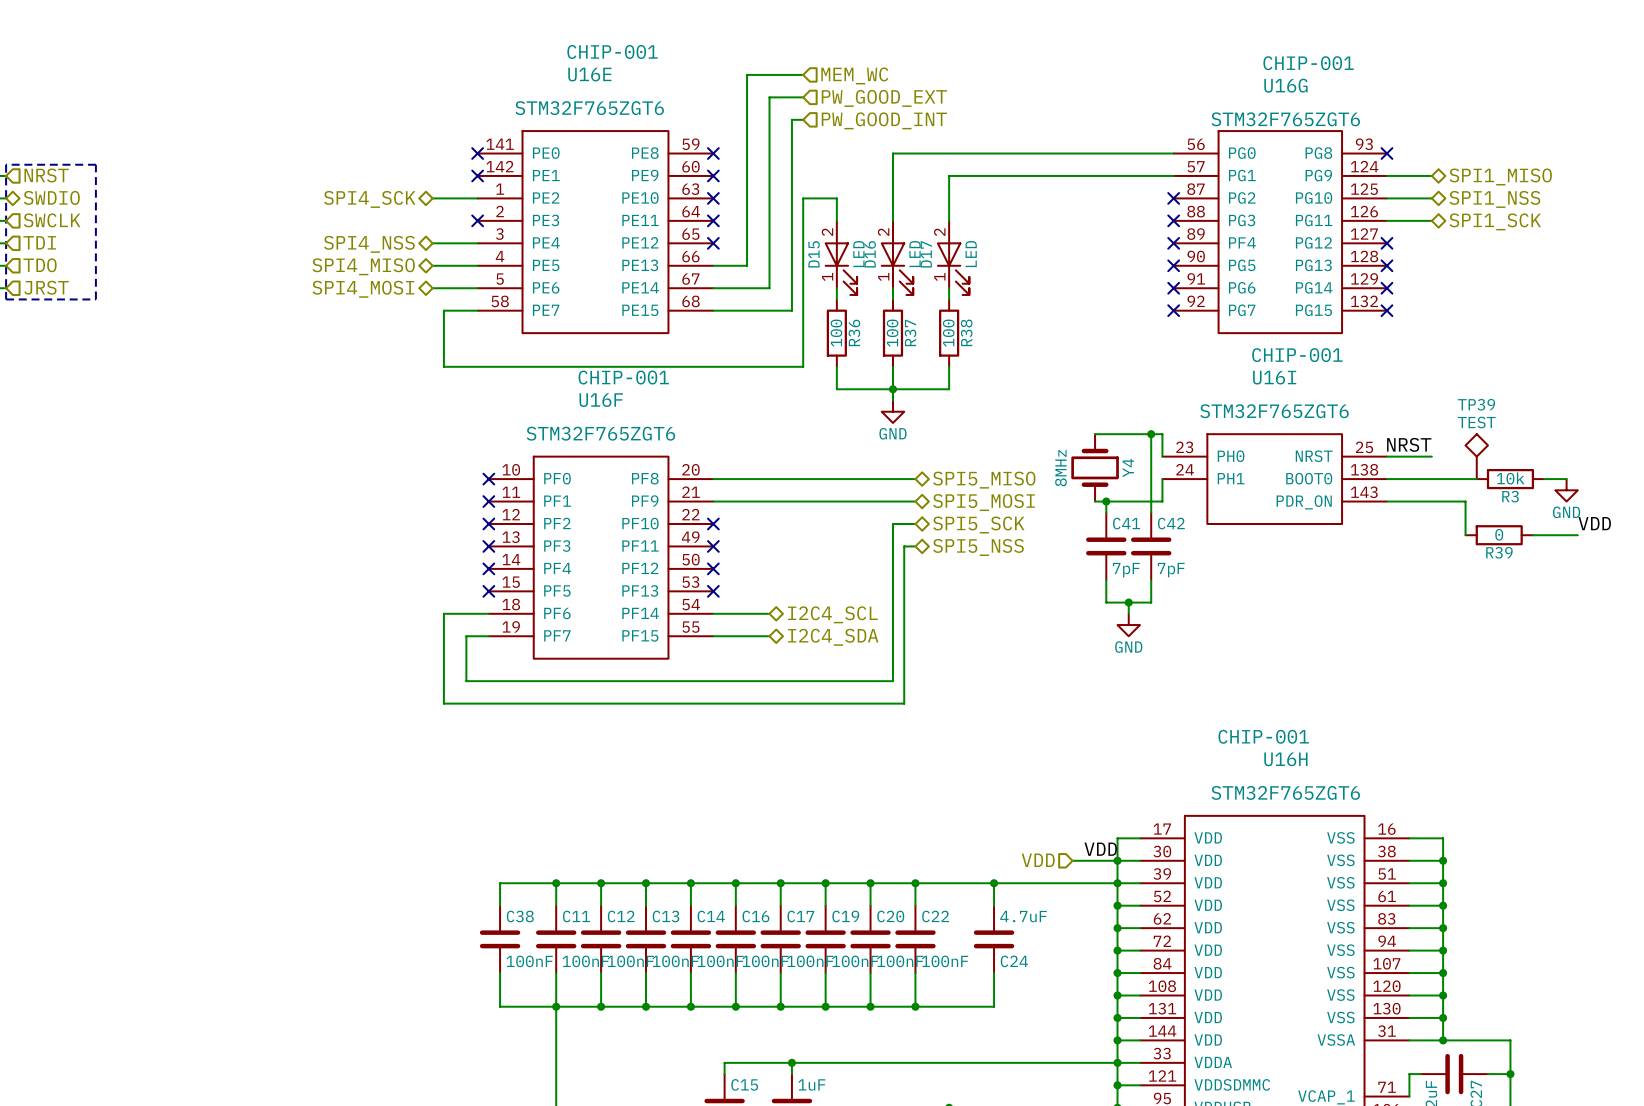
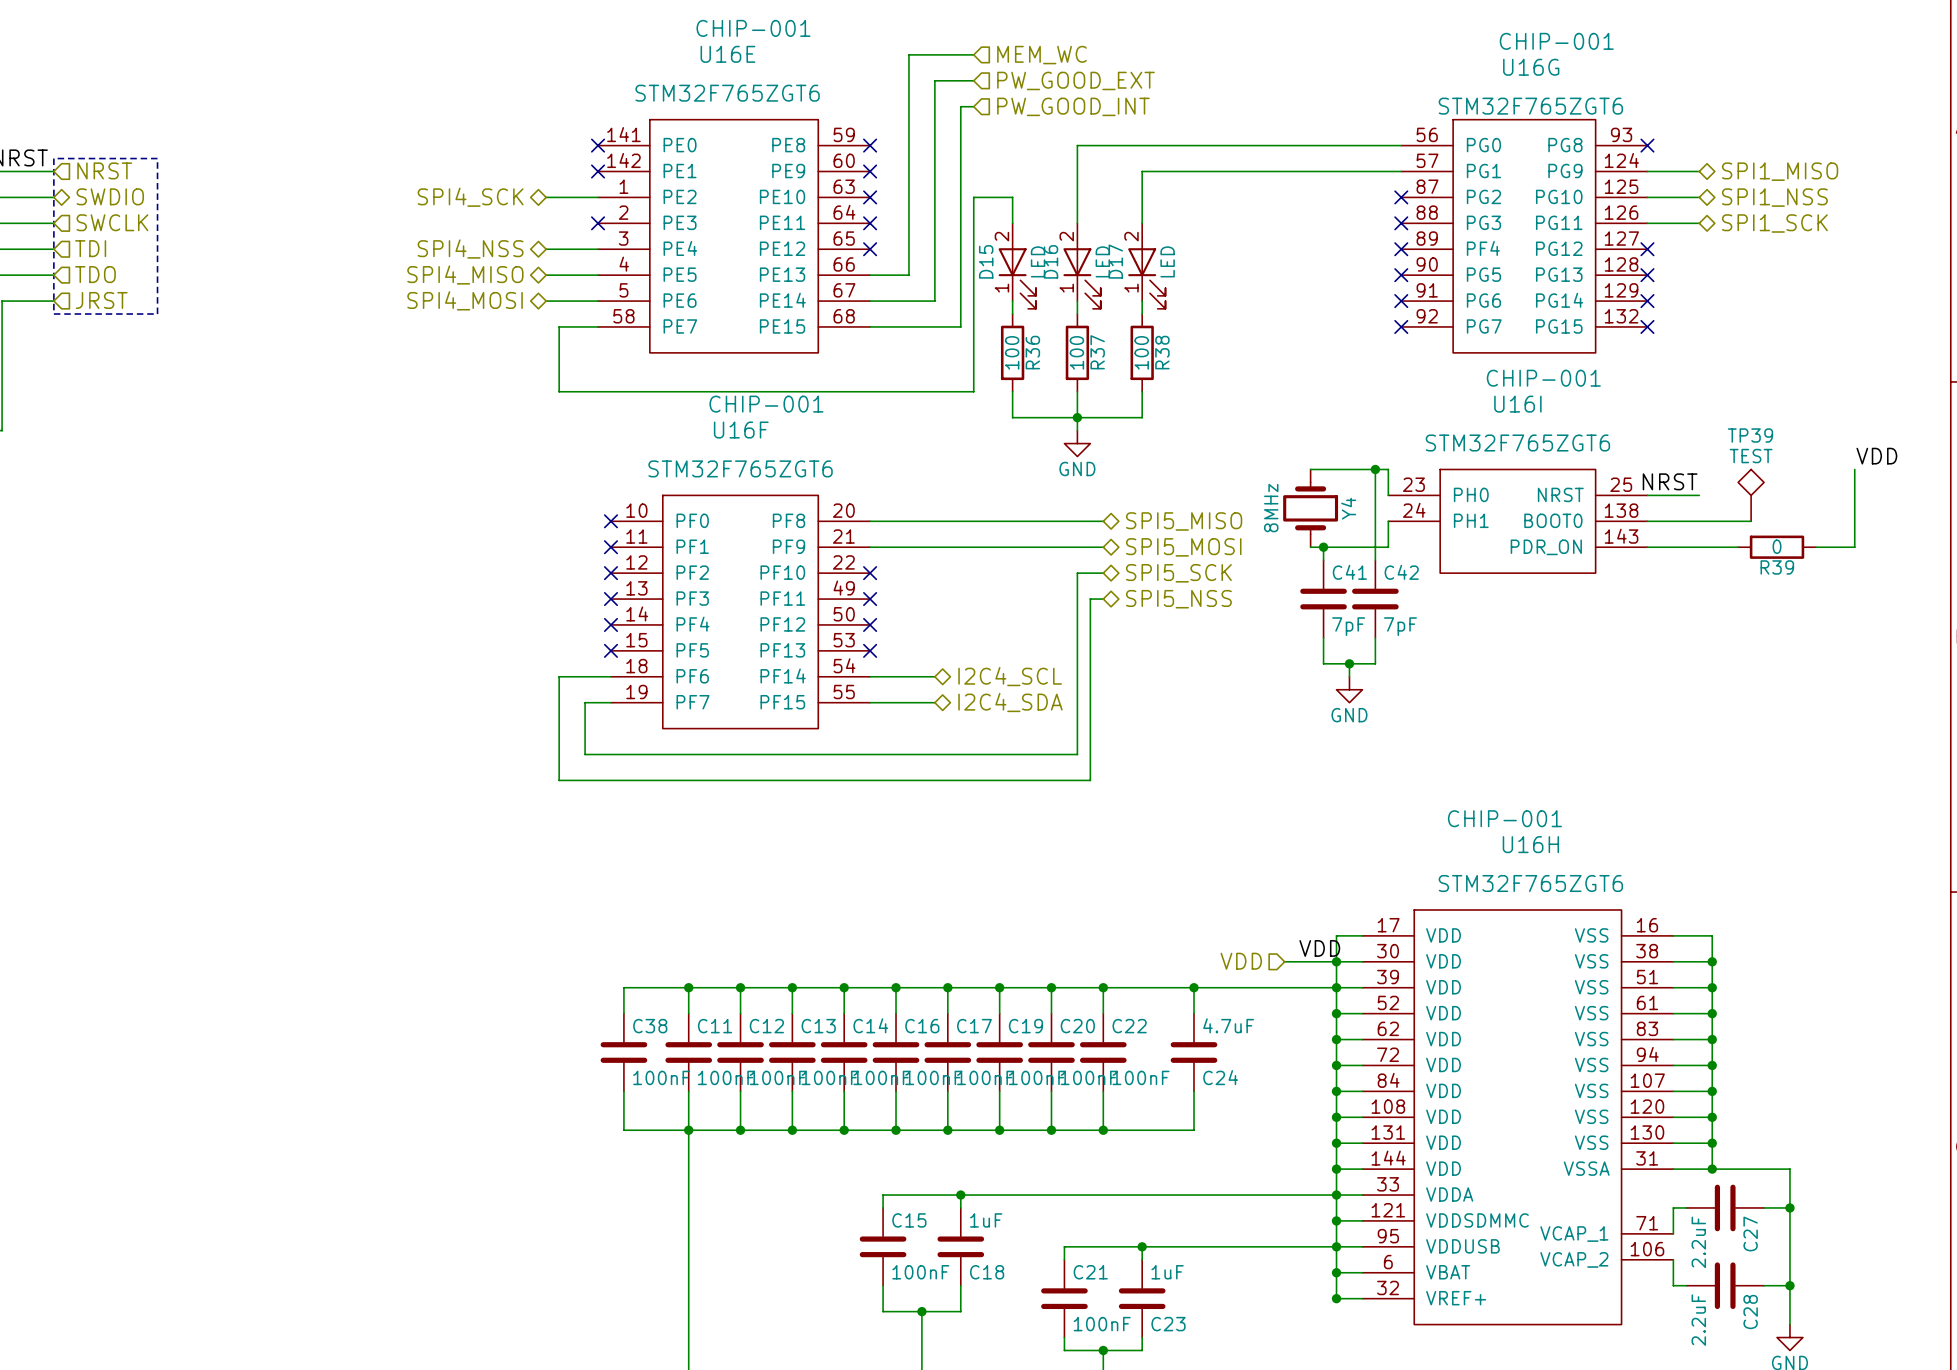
wire: none -> (1854, 469) (1854, 547) (1815, 547)
R3: 10k (1510, 479) -> none
wire: (1544, 479) (1566, 479) -> none
power symbol: GND (1566, 490) -> none
wire: (1465, 501) (1465, 535) -> none
label position: VDD (1594, 523) -> VDD (1876, 456)
R39 position: (1499, 535) -> (1777, 547)
wire: (1532, 535) (1577, 535) -> none

